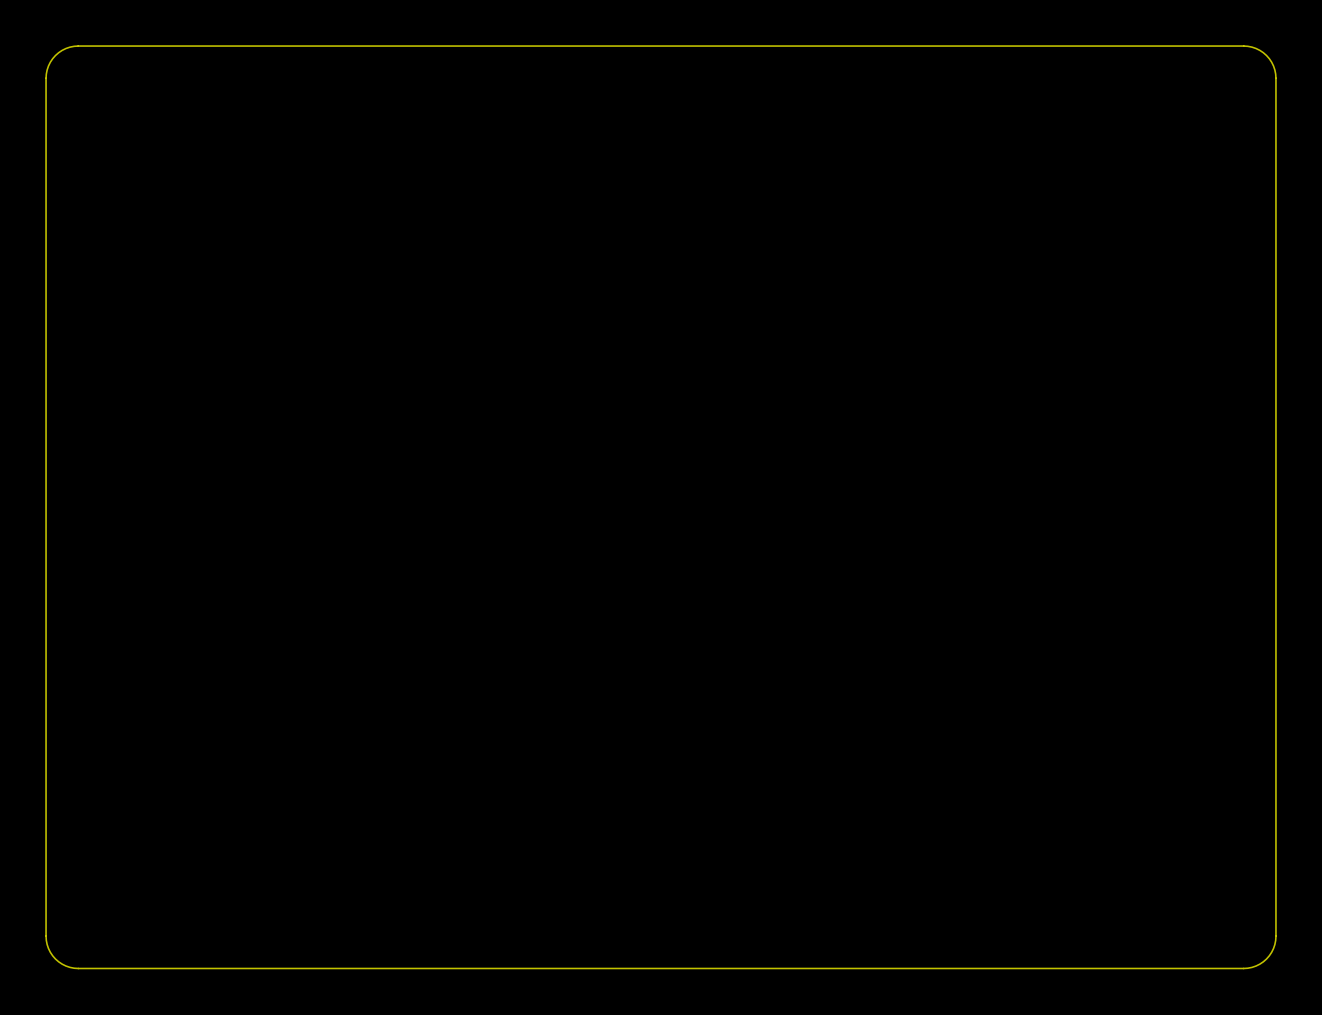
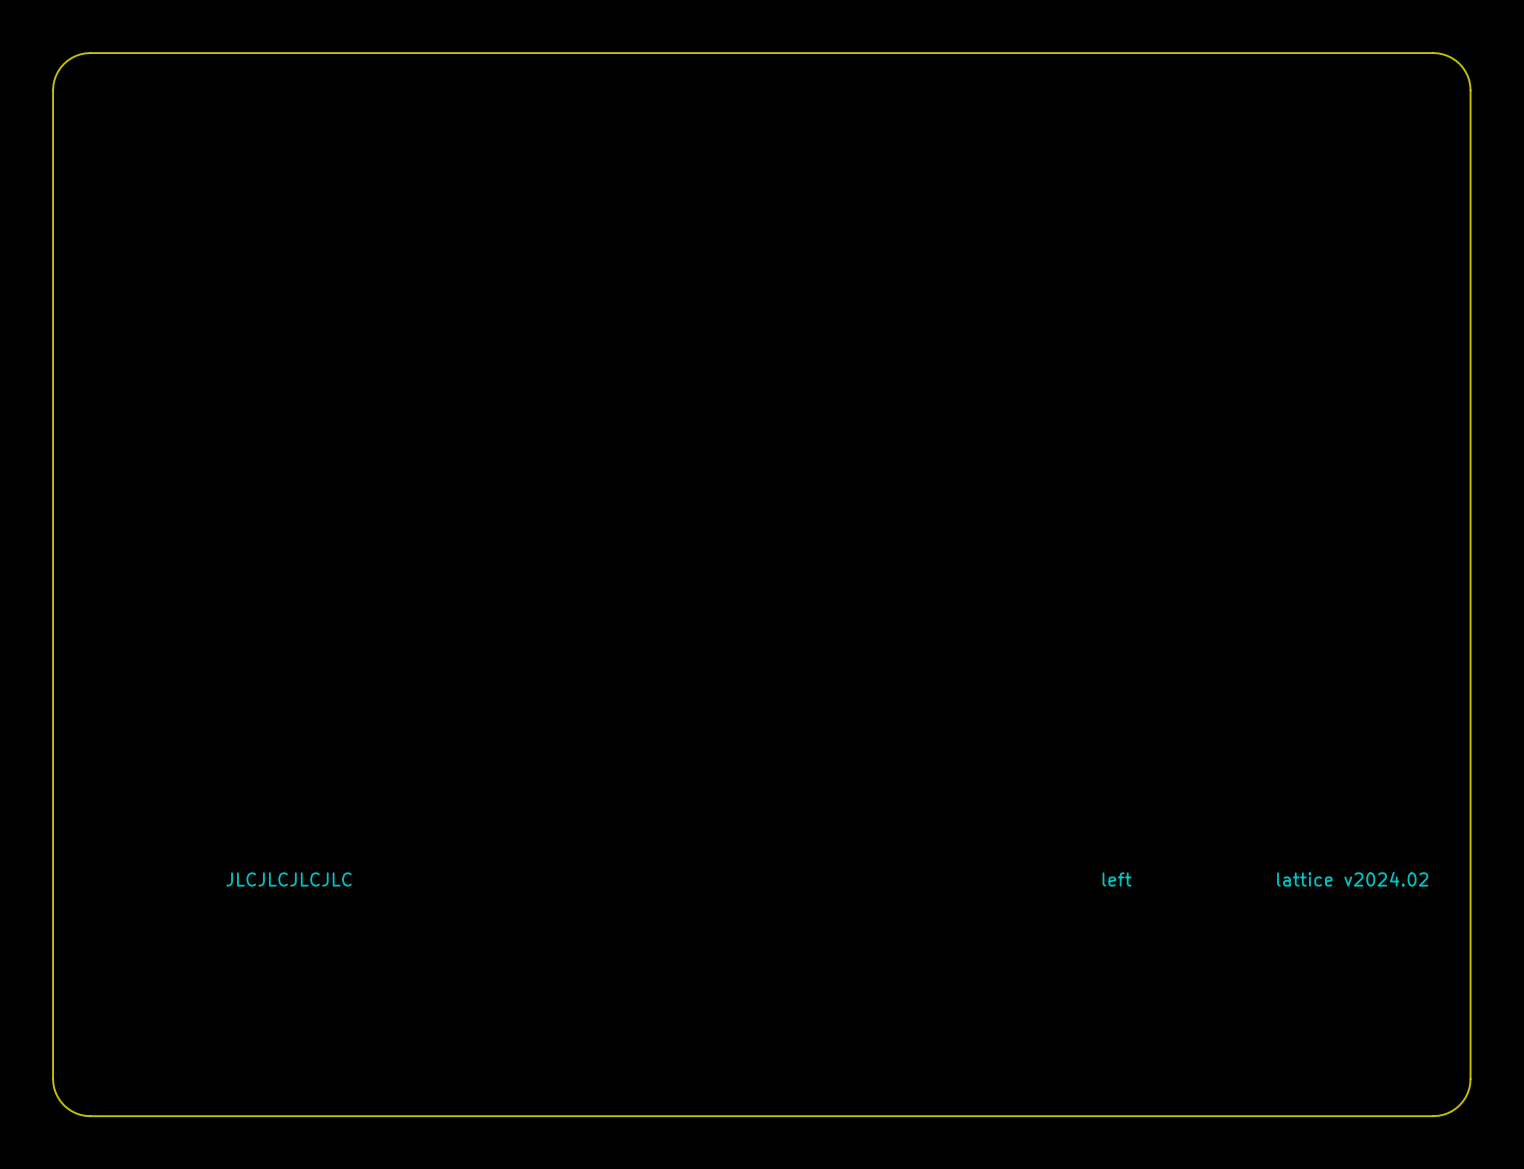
text: none -> left (1117, 879)
text: none -> lattice v2024.02 (1352, 879)
text: none -> JLCJLCJLCJLC (289, 879)

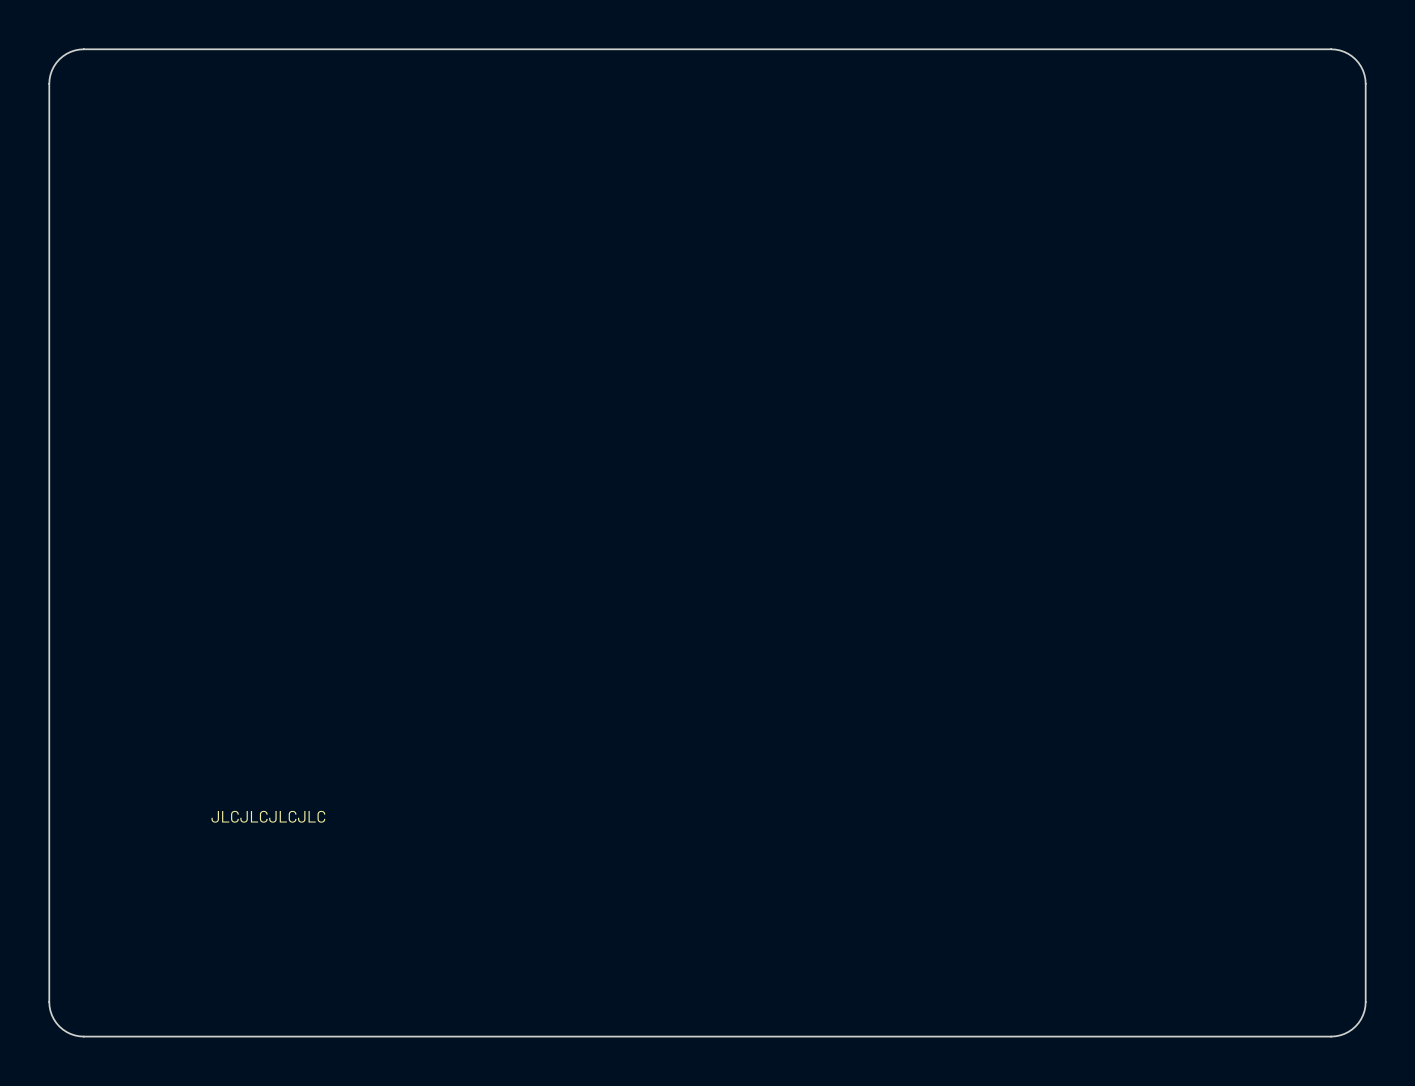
text: left (1117, 879) -> none
text: lattice v2024.02 (1352, 879) -> none

